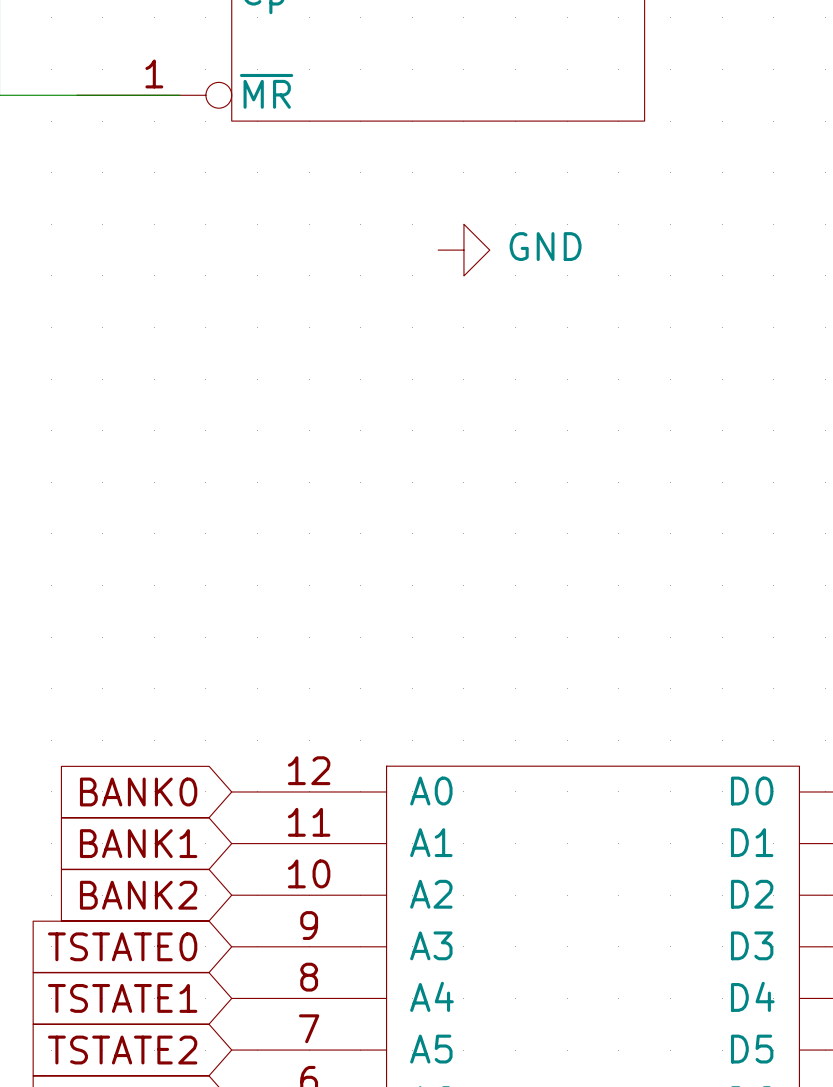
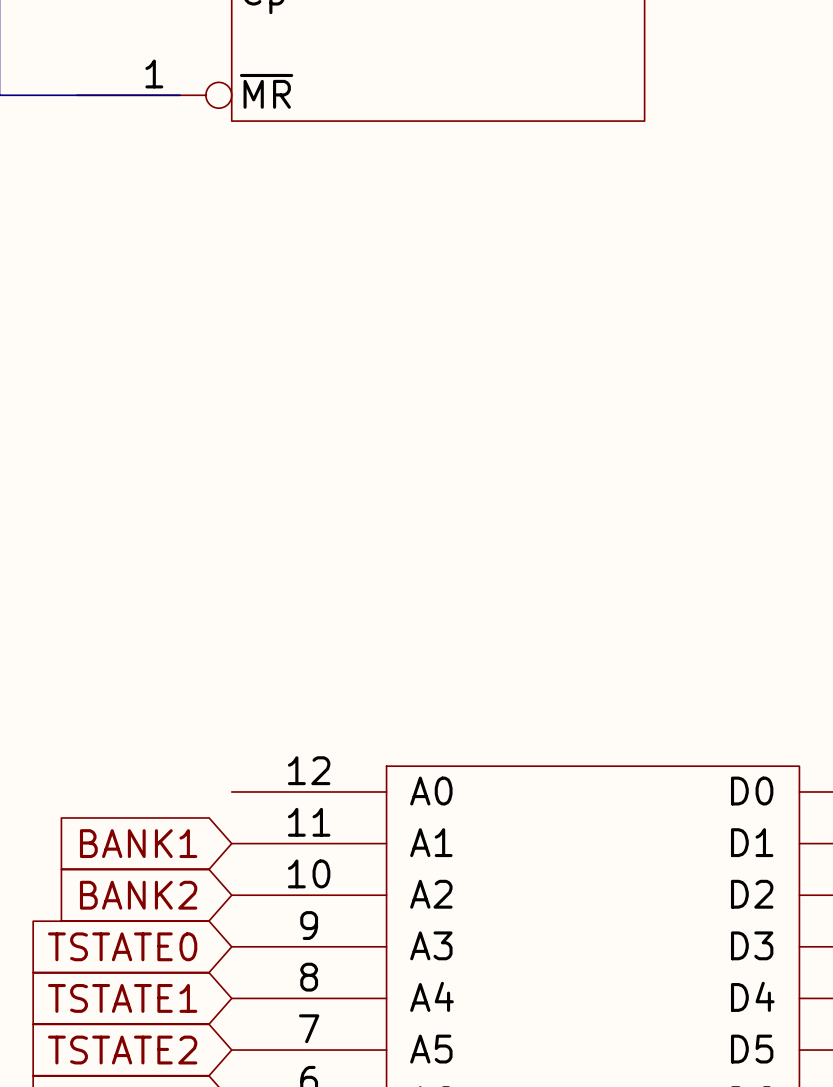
power symbol: GND (463, 250) -> none
global label: BANK0 (138, 791) -> none

